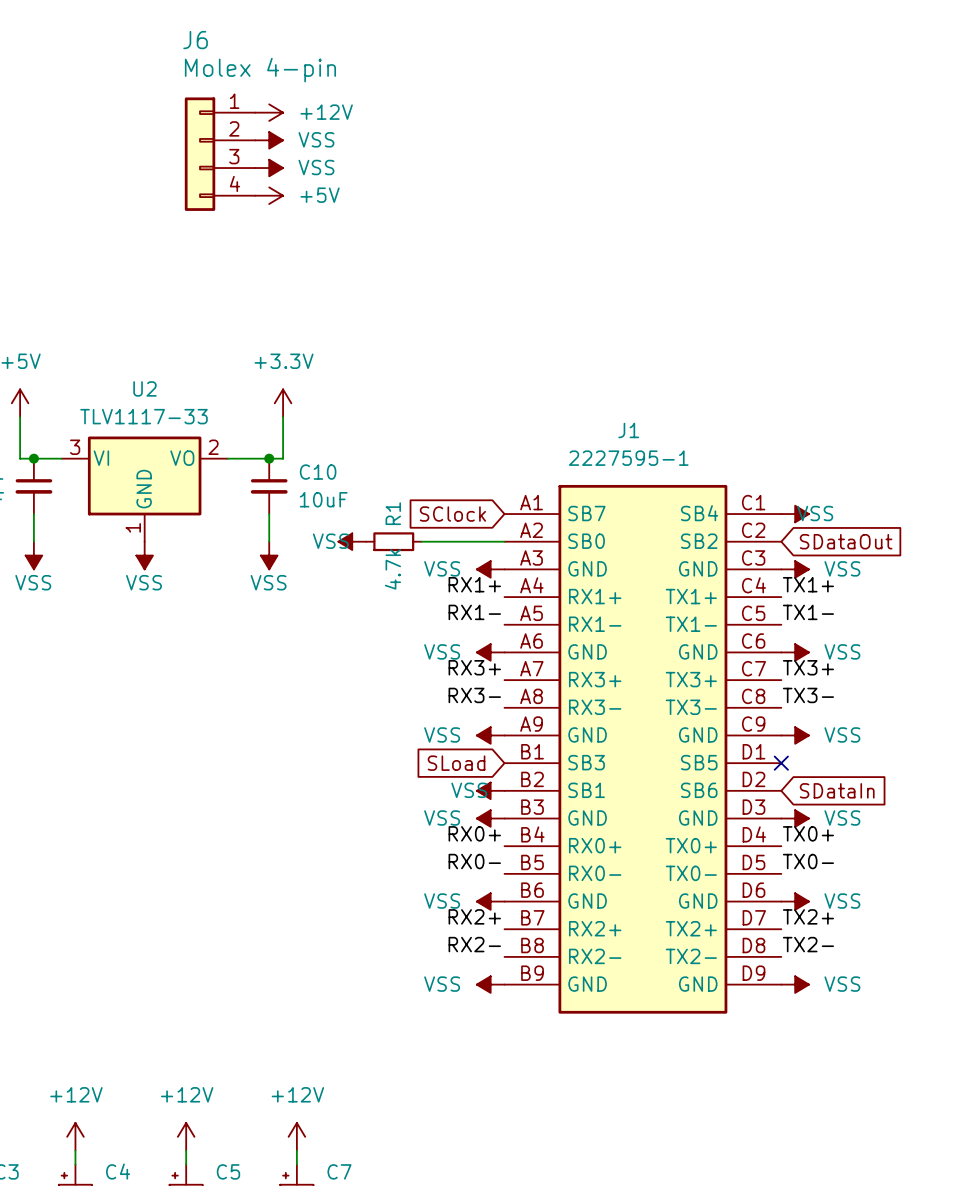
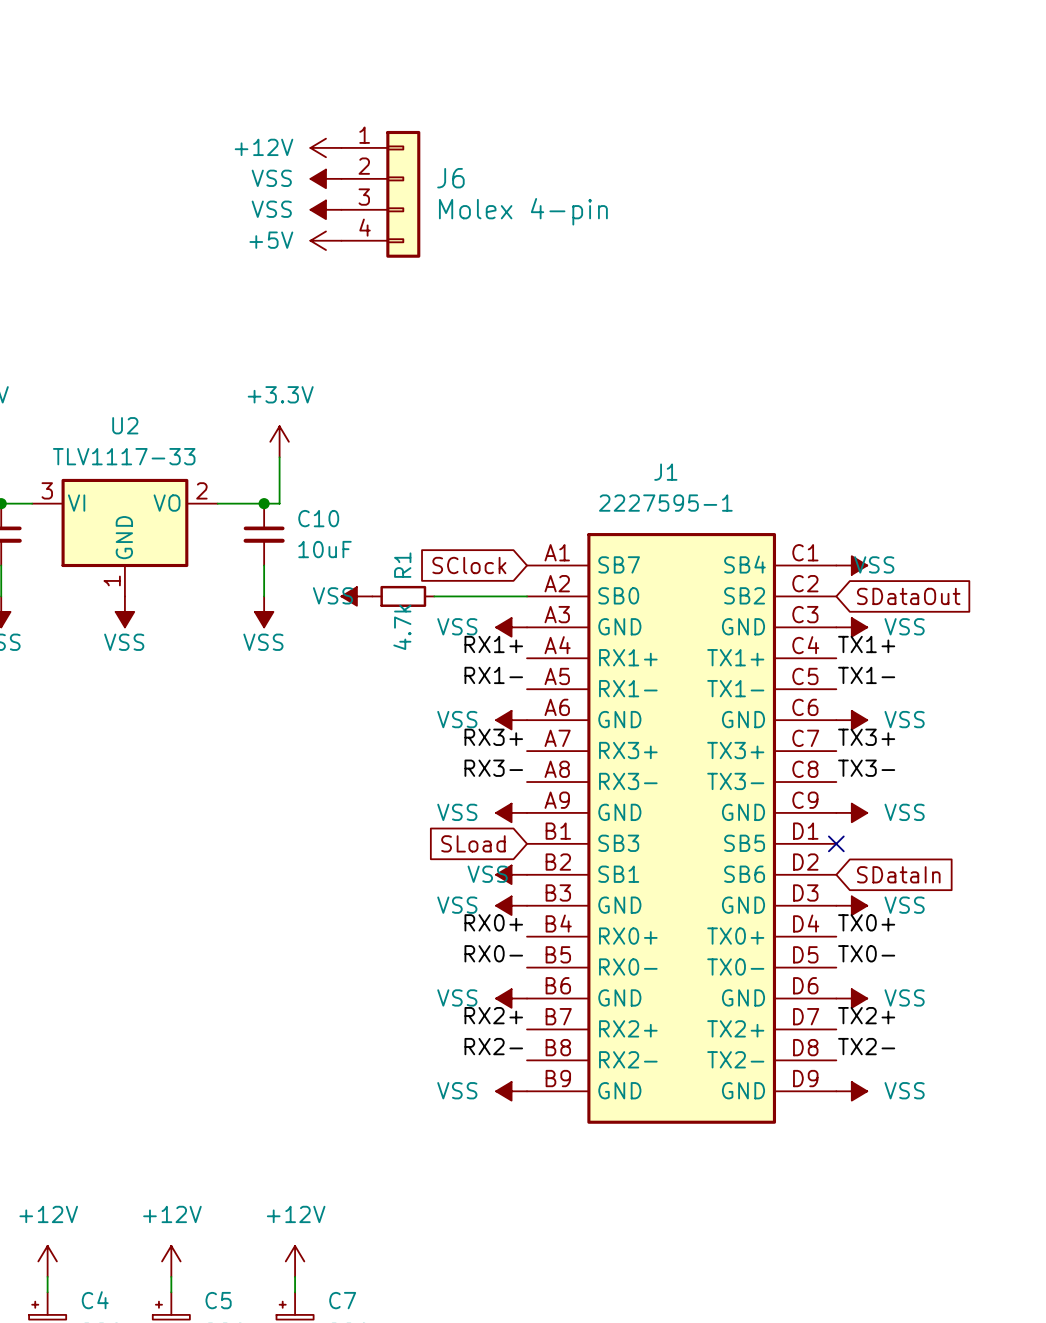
J6 name position: J6 (195, 40) -> J6 (450, 178)
J6 value position: Molex 4-pin (260, 70) -> Molex 4-pin (523, 211)
power symbol rotation: 0° (269, 112) -> 180° (325, 147)
power symbol position: +12V (269, 112) -> +12V (325, 147)
power symbol: VSS (269, 140) -> none
J6 flip: as is (200, 154) -> left-right (403, 194)
J6 position: (220, 154) -> (380, 194)
power symbol: VSS (269, 168) -> none
power symbol: none -> VSS (325, 178)
power symbol rotation: 0° (269, 195) -> 180° (325, 240)
power symbol position: +5V (269, 195) -> +5V (325, 240)
power symbol: none -> VSS (325, 209)

